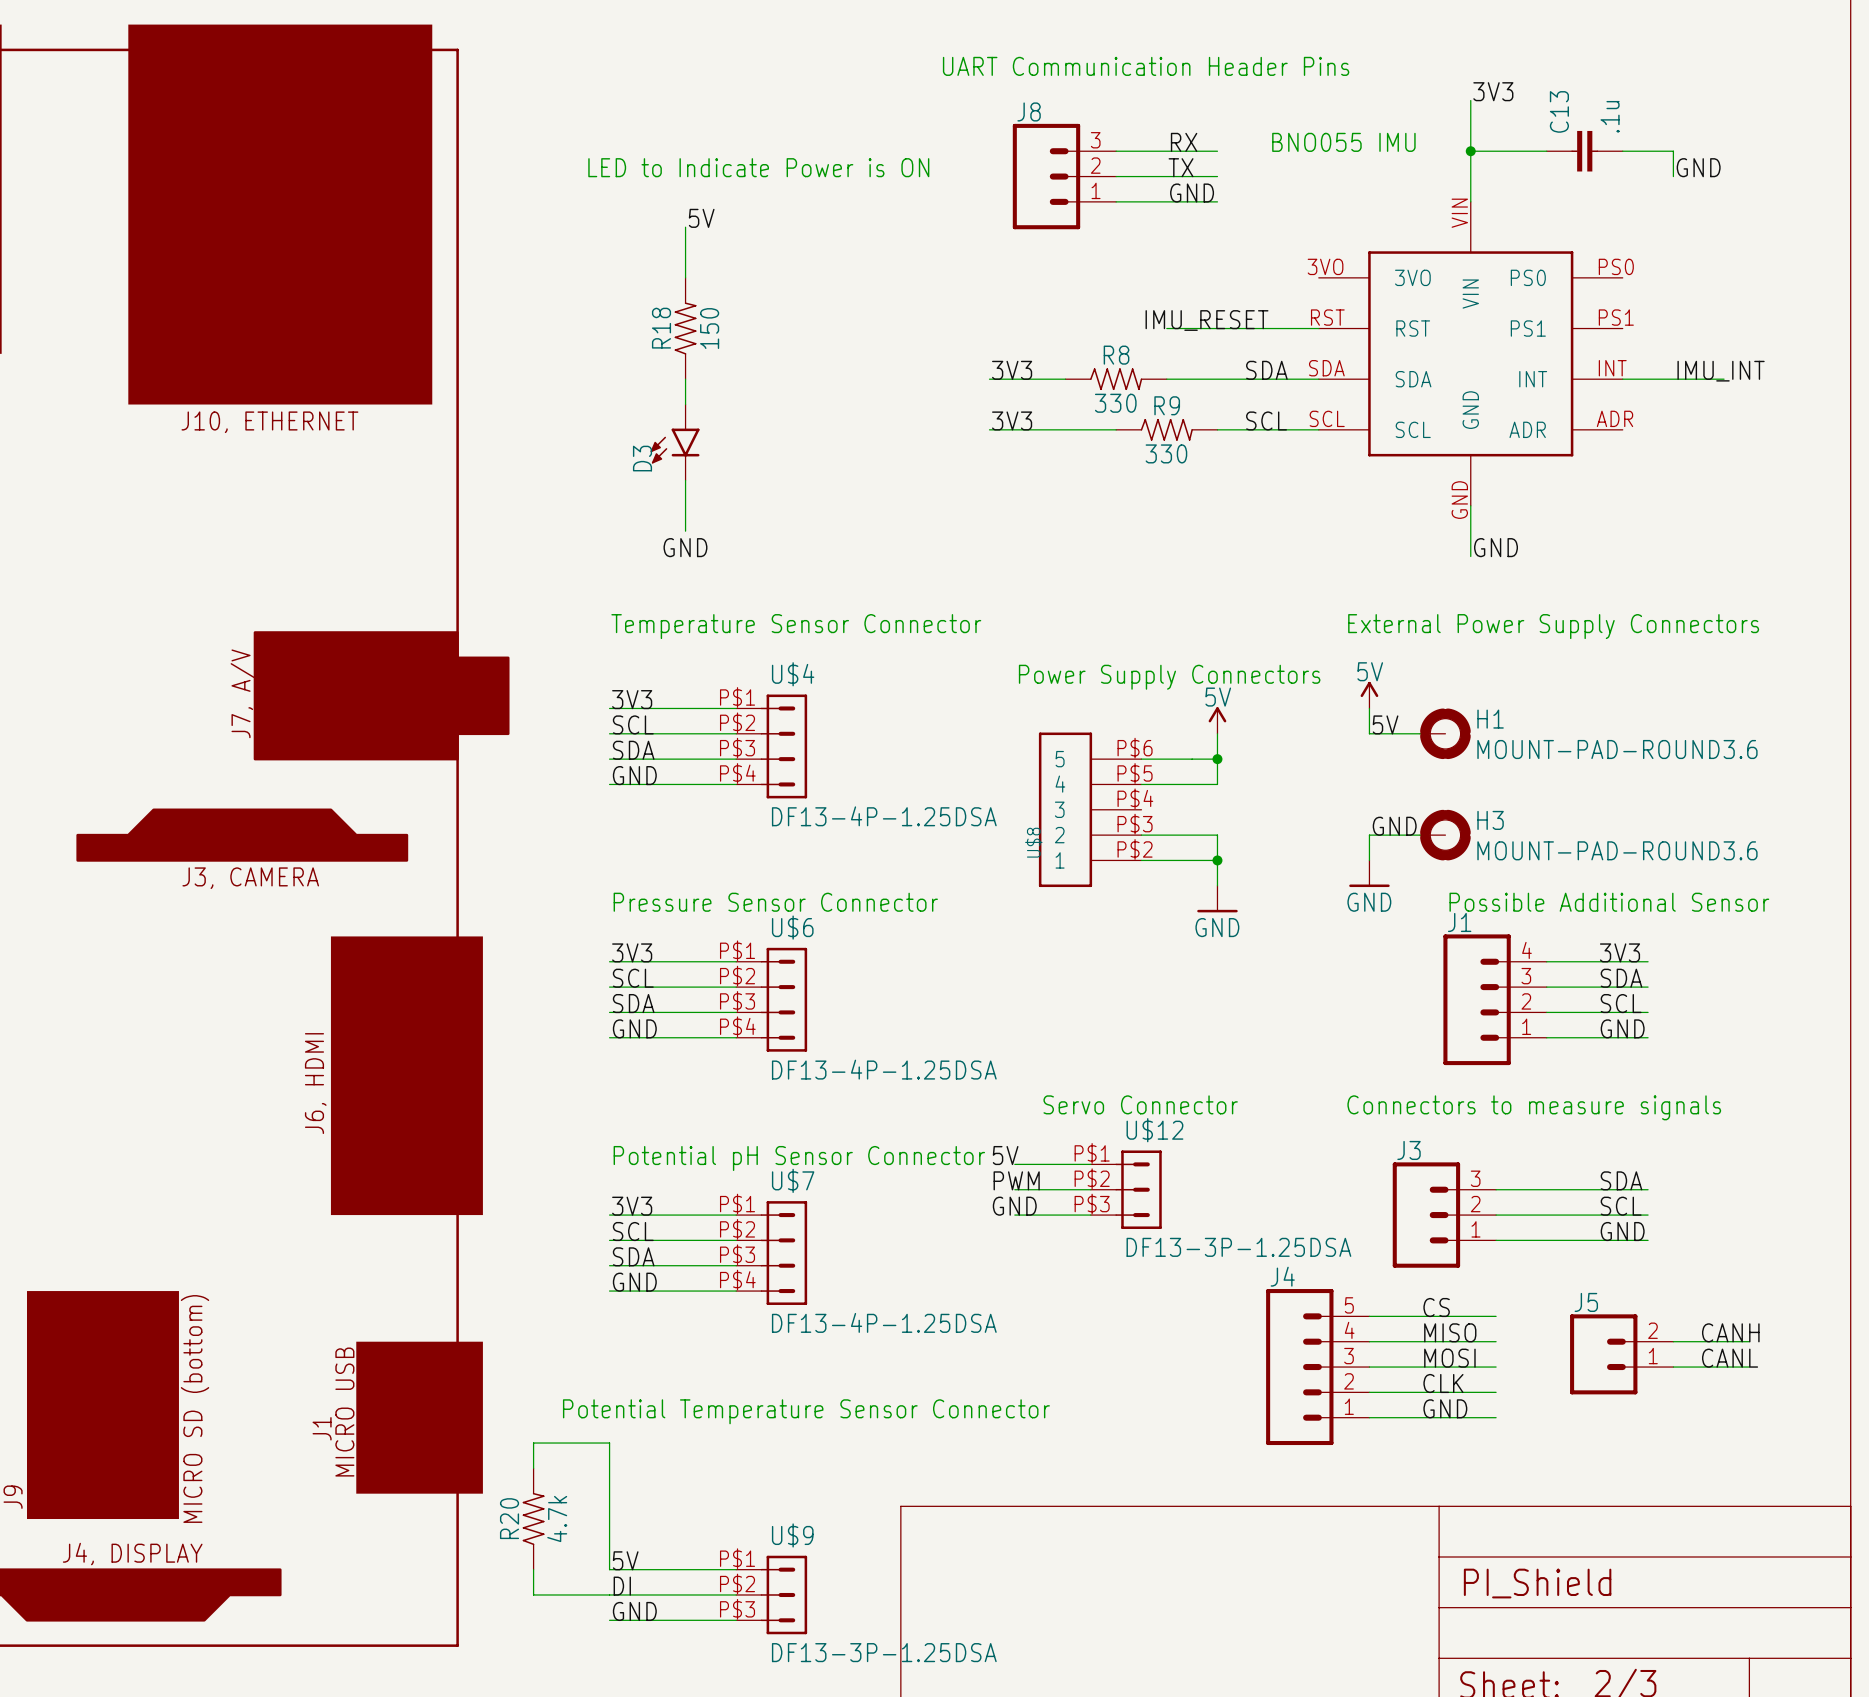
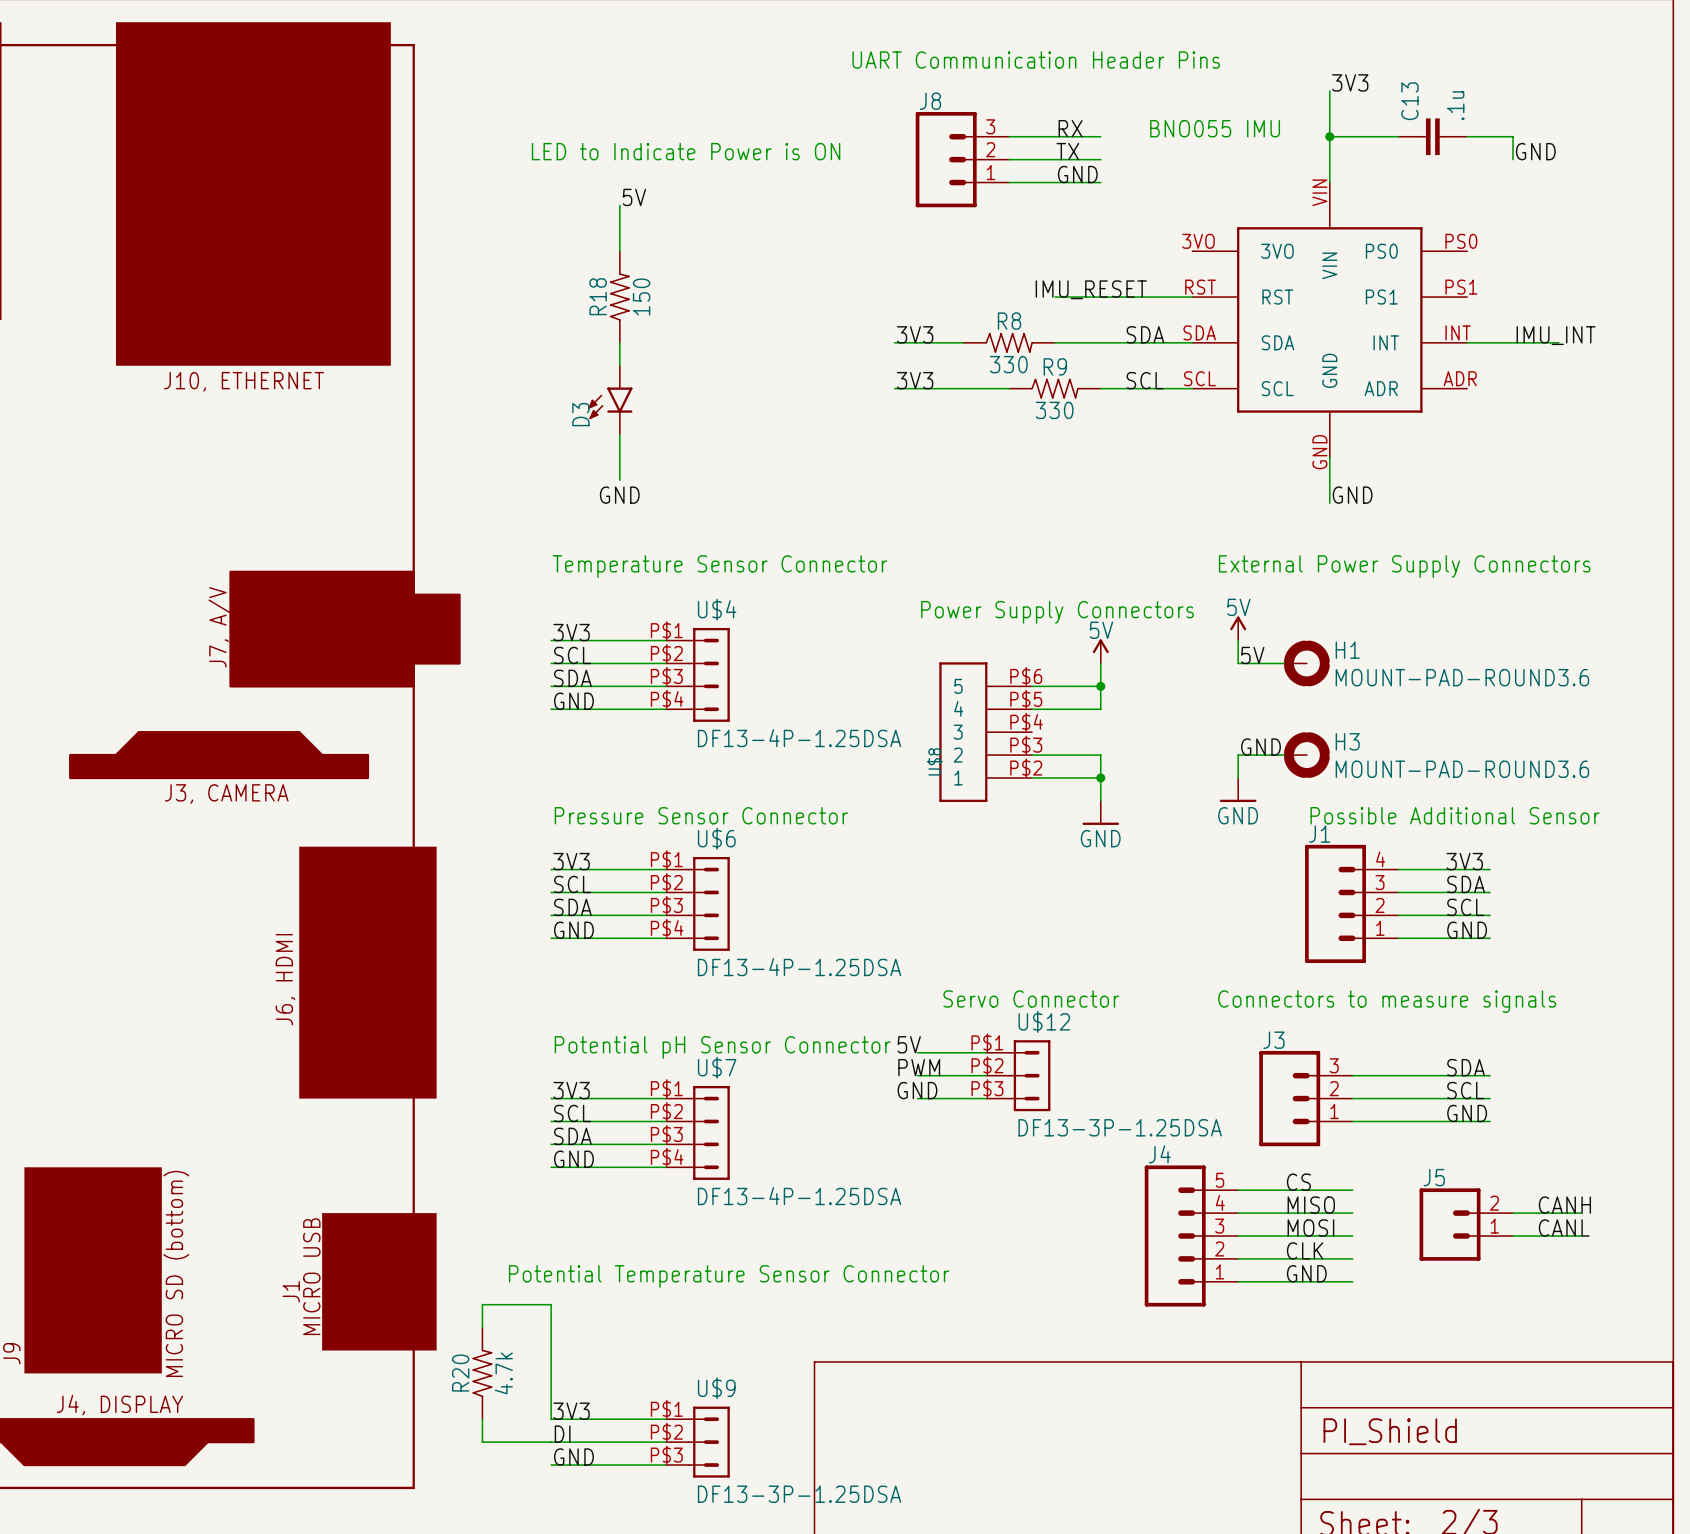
label: 5V (625, 1560) -> 3V3 (571, 1411)

